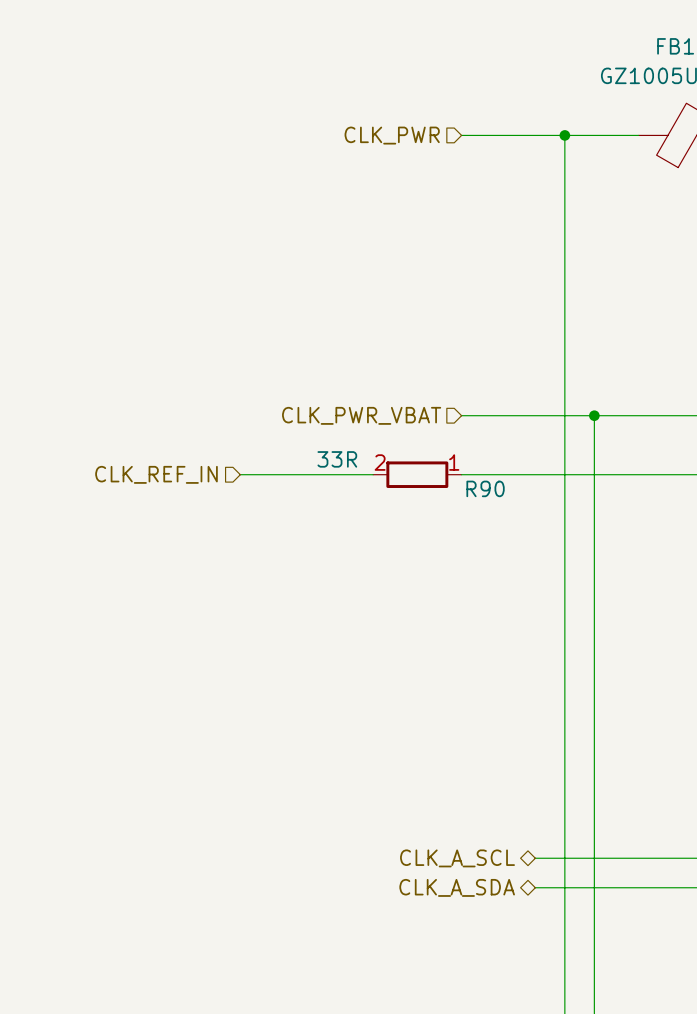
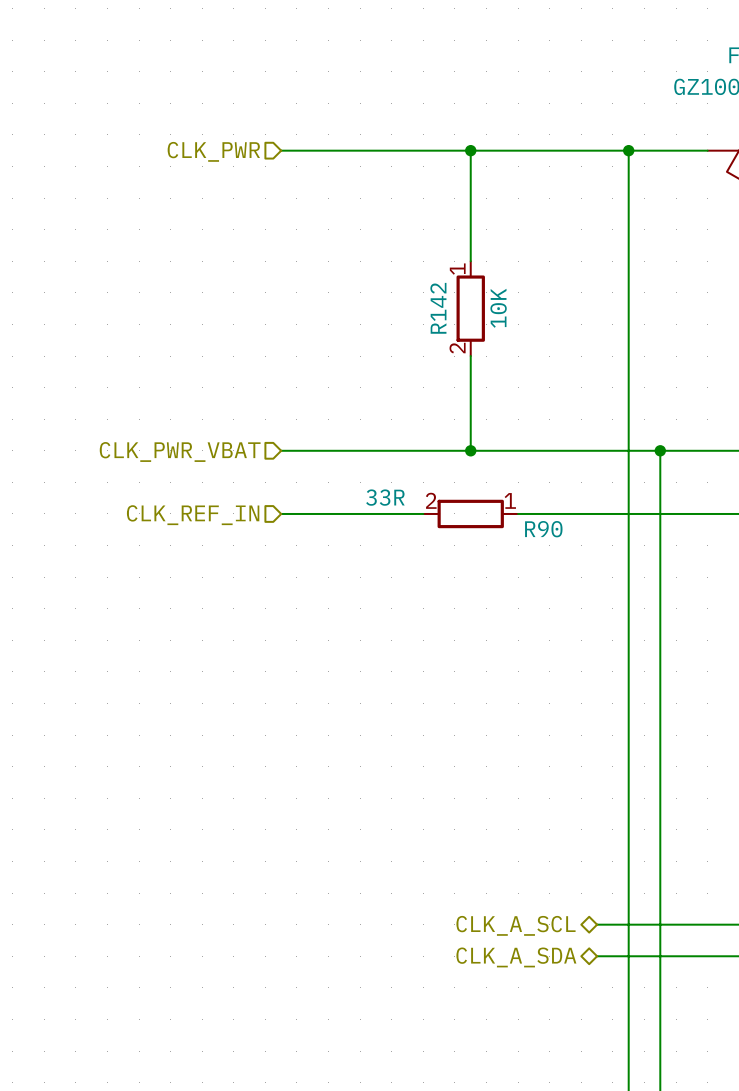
wire: none -> (281, 150) (518, 150)
hierarchical label position: CLK_PWR (392, 135) -> CLK_PWR (213, 151)
wire: none -> (470, 150) (470, 261)
junction: none -> (470, 150)
R142: none -> 10K (470, 308)
wire: none -> (470, 356) (470, 450)
wire: none -> (281, 450) (518, 450)
hierarchical label position: CLK_PWR_VBAT (361, 415) -> CLK_PWR_VBAT (180, 451)
junction: none -> (470, 450)

